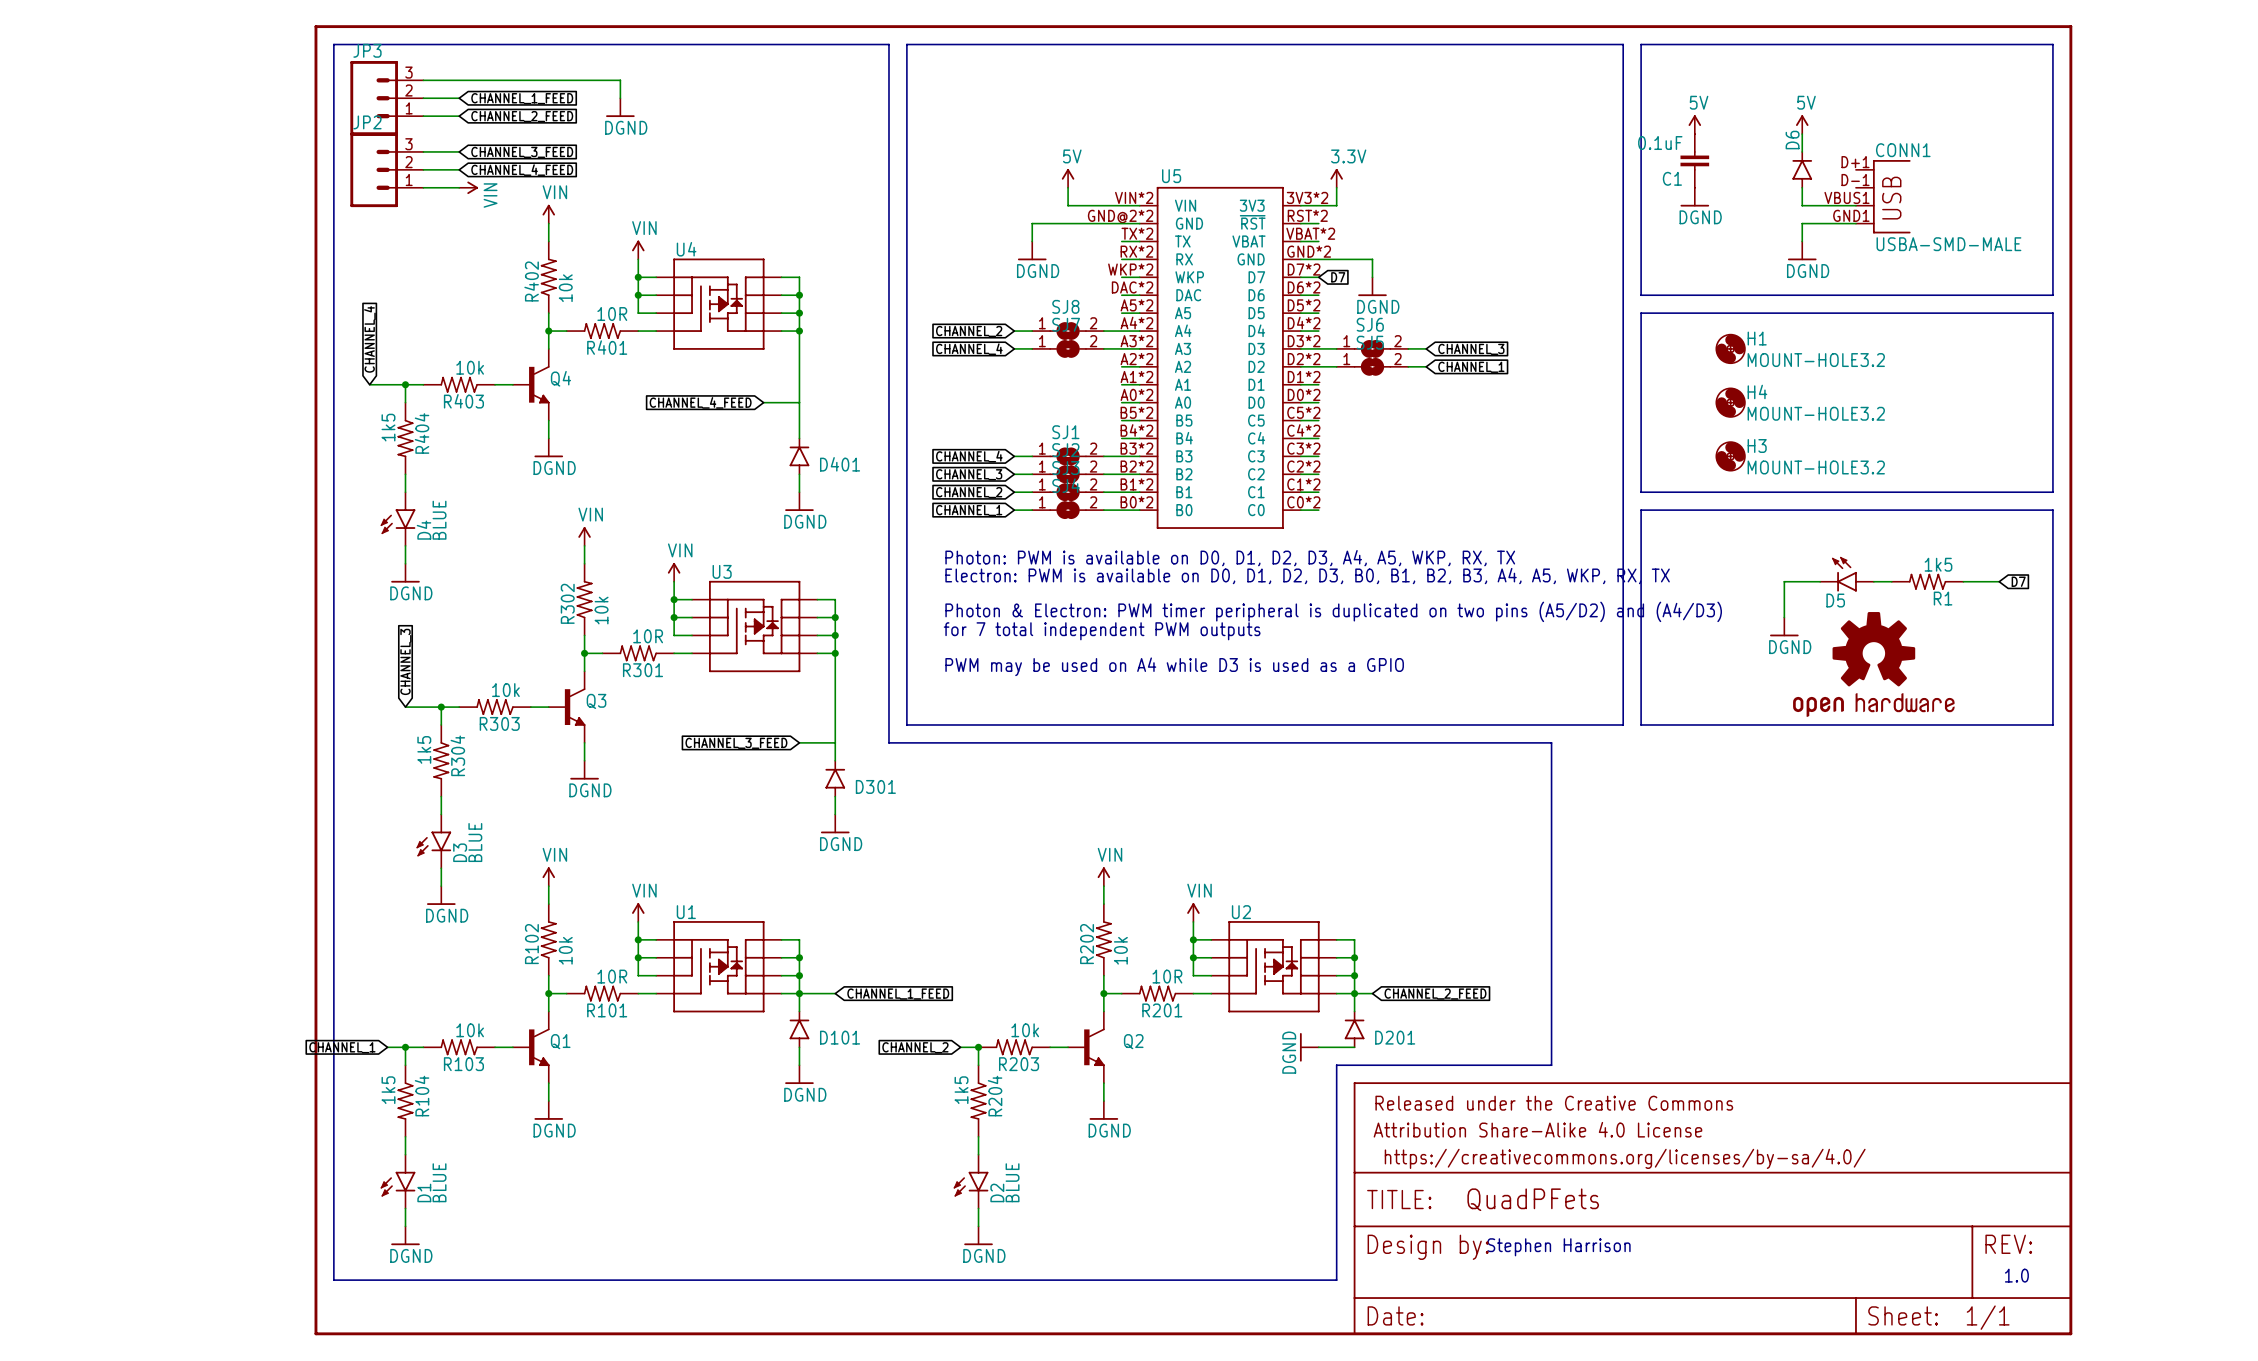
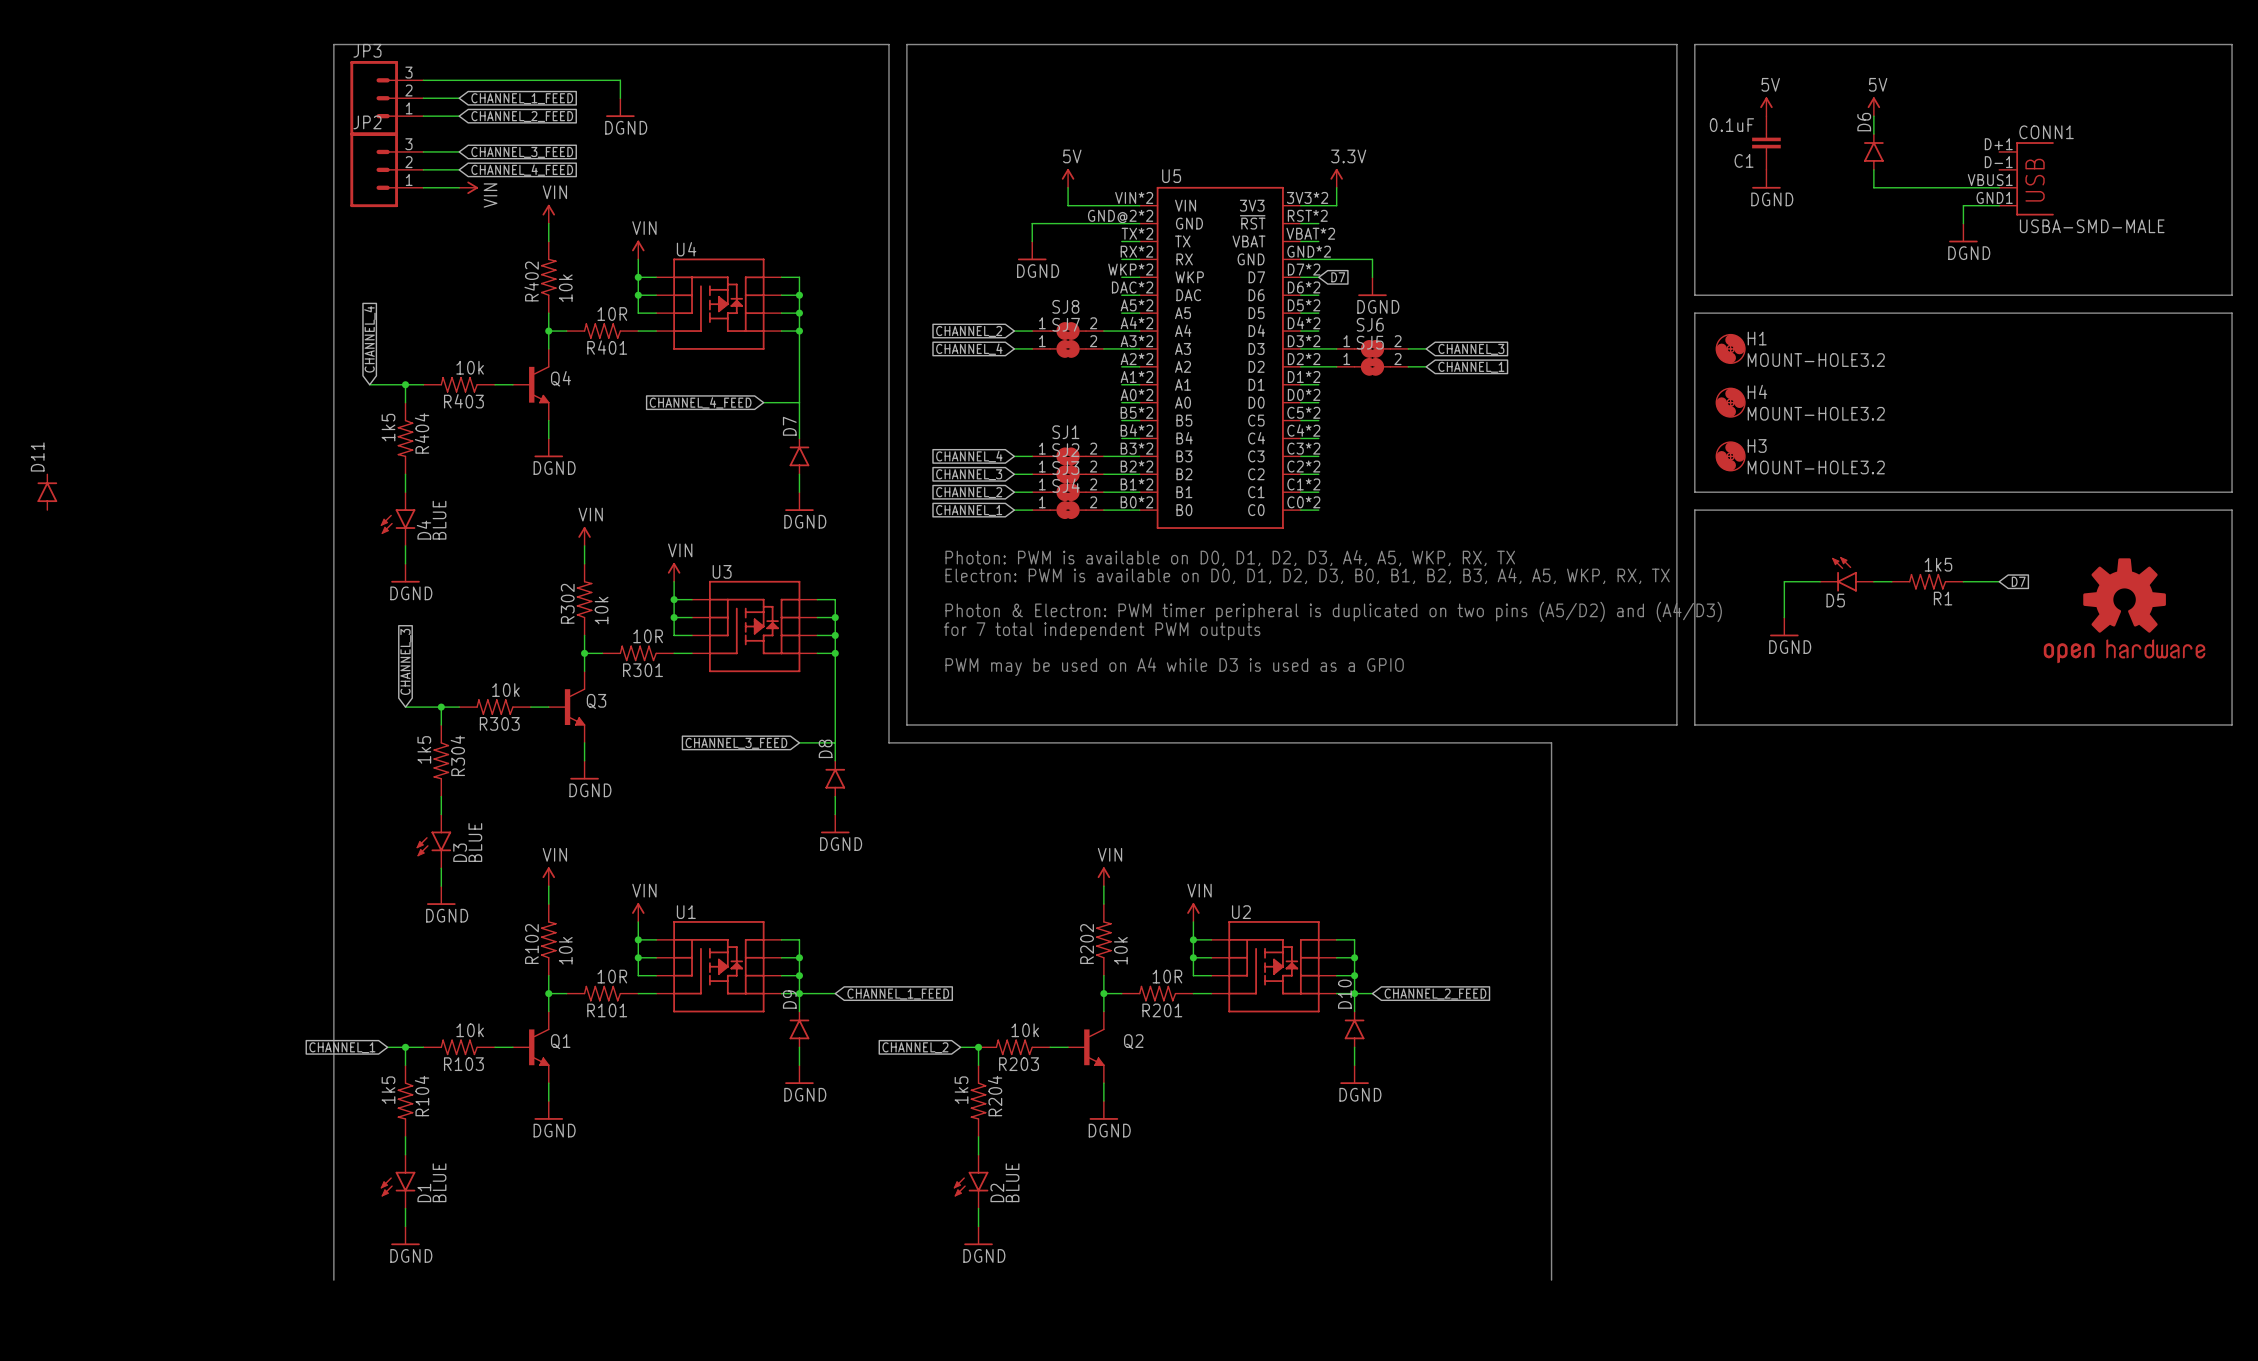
line: (1623, 44) (1623, 724) -> (1623, 44) (1641, 44)
line: (1641, 44) (1641, 295) (1694, 295) -> (1694, 44) (1694, 295)
line: (1676, 44) (1694, 44) -> (1676, 44) (1676, 724)
line: (2052, 44) (2052, 295) -> (2052, 44) (2232, 44) (2232, 295) (2052, 295)
power symbol: none -> 5V (1766, 106)
power symbol: none -> 5V (1873, 106)
power symbol: 5V (1694, 124) -> none
power symbol: 5V (1802, 124) -> none
wire: (1802, 134) (1802, 151) -> (1873, 116) (1873, 134)
C1 position: (1694, 160) -> (1766, 143)
D6 position: (1802, 169) -> (1873, 151)
wire: none -> (1873, 169) (1873, 187) (1999, 187)
power symbol: none -> DGND (1766, 179)
wire: (1802, 187) (1802, 205) (1855, 205) -> none
CONN1 position: (1883, 196) -> (2026, 178)
power symbol: DGND (1694, 197) -> none
wire: none -> (1999, 205) (1963, 205) (1963, 223)
wire: (1855, 223) (1802, 223) (1802, 241) -> none
power symbol: none -> DGND (1963, 232)
power symbol: DGND (1802, 250) -> none
line: (1694, 313) (1641, 313) (1641, 492) (1694, 492) -> (1694, 313) (1694, 492)
line: (2052, 313) (2052, 492) -> (2052, 313) (2232, 313) (2232, 492) (2052, 492)
D401 name: D401 (840, 464) -> D7 (789, 426)
D11: none -> (47, 492)
line: (1694, 510) (1641, 510) (1641, 724) -> (1694, 510) (1694, 724)
line: (2052, 510) (2052, 724) -> (2052, 510) (2232, 510) (2232, 724) (2052, 724)
part: none -> (2124, 610)
part: (1873, 664) -> none
part: (1193, 680) -> none
line: (1676, 724) (1694, 724) -> (1623, 724) (1641, 724)
D301 name: D301 (875, 786) -> D8 (825, 748)
D101 name: D101 (840, 1037) -> D9 (789, 999)
D201 name: D201 (1395, 1037) -> D10 (1344, 994)
power symbol rotation: 0° (1300, 1047) -> 90° counterclockwise (1354, 1083)
power symbol position: DGND (1309, 1047) -> DGND (1354, 1074)
wire: (1318, 1047) (1354, 1047) -> (1354, 1065) (1354, 1047)
line: (1551, 1065) (1336, 1065) (1336, 1280) (333, 1280) -> (1551, 1065) (1551, 1280)
part: (1712, 1208) -> none
text: Stephen Harrison (1559, 1247) -> none
text: 1.0 (2016, 1275) -> none

